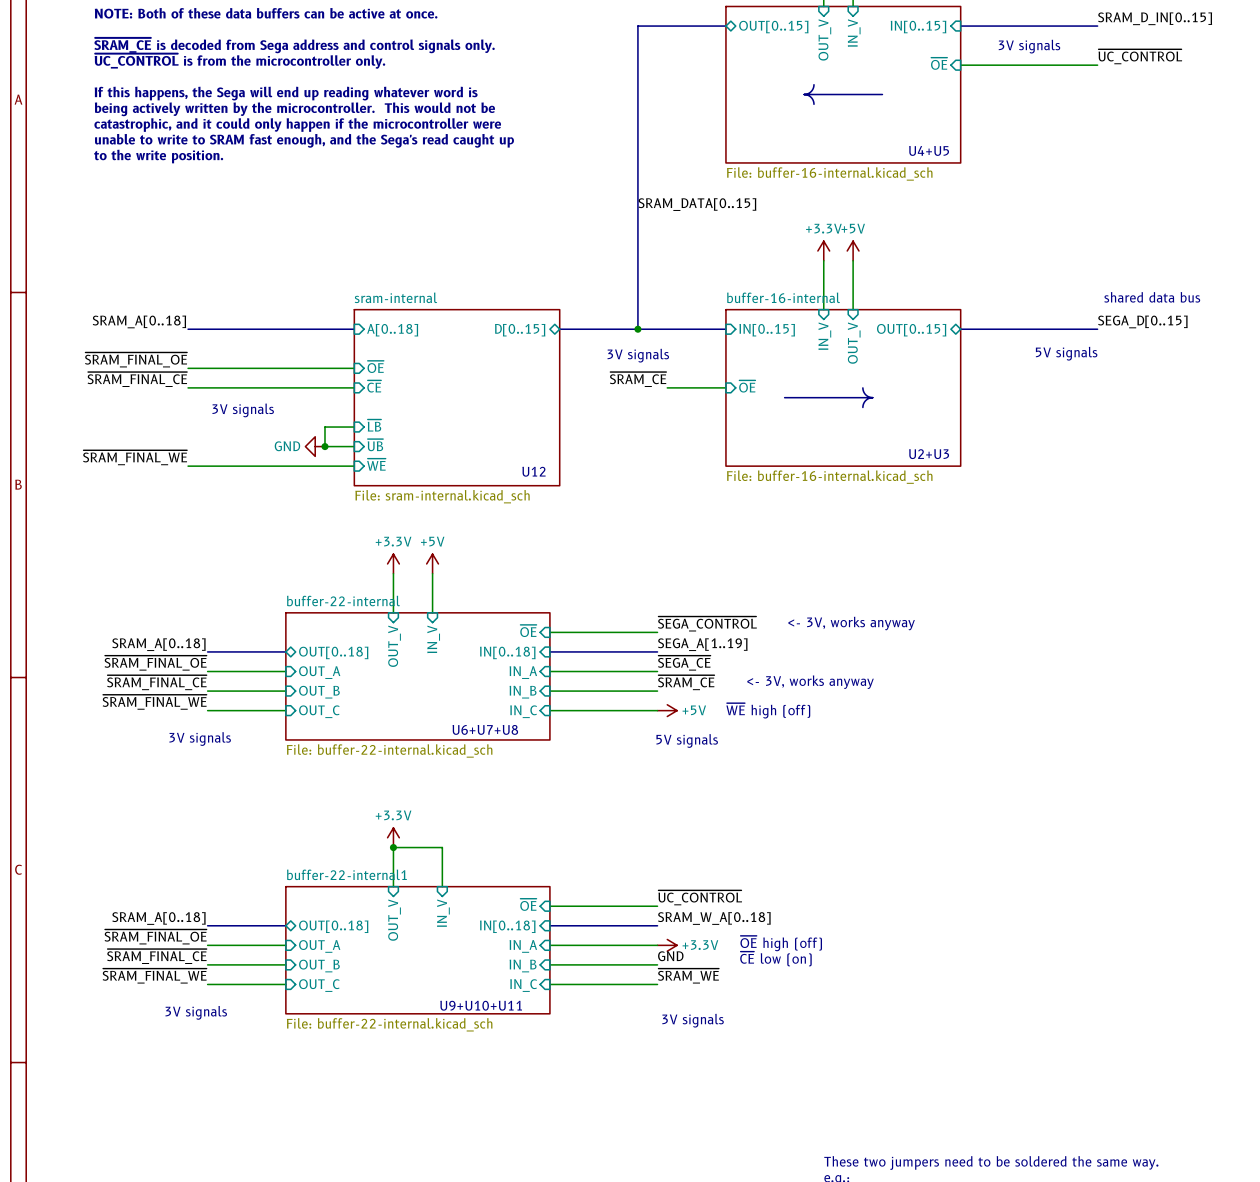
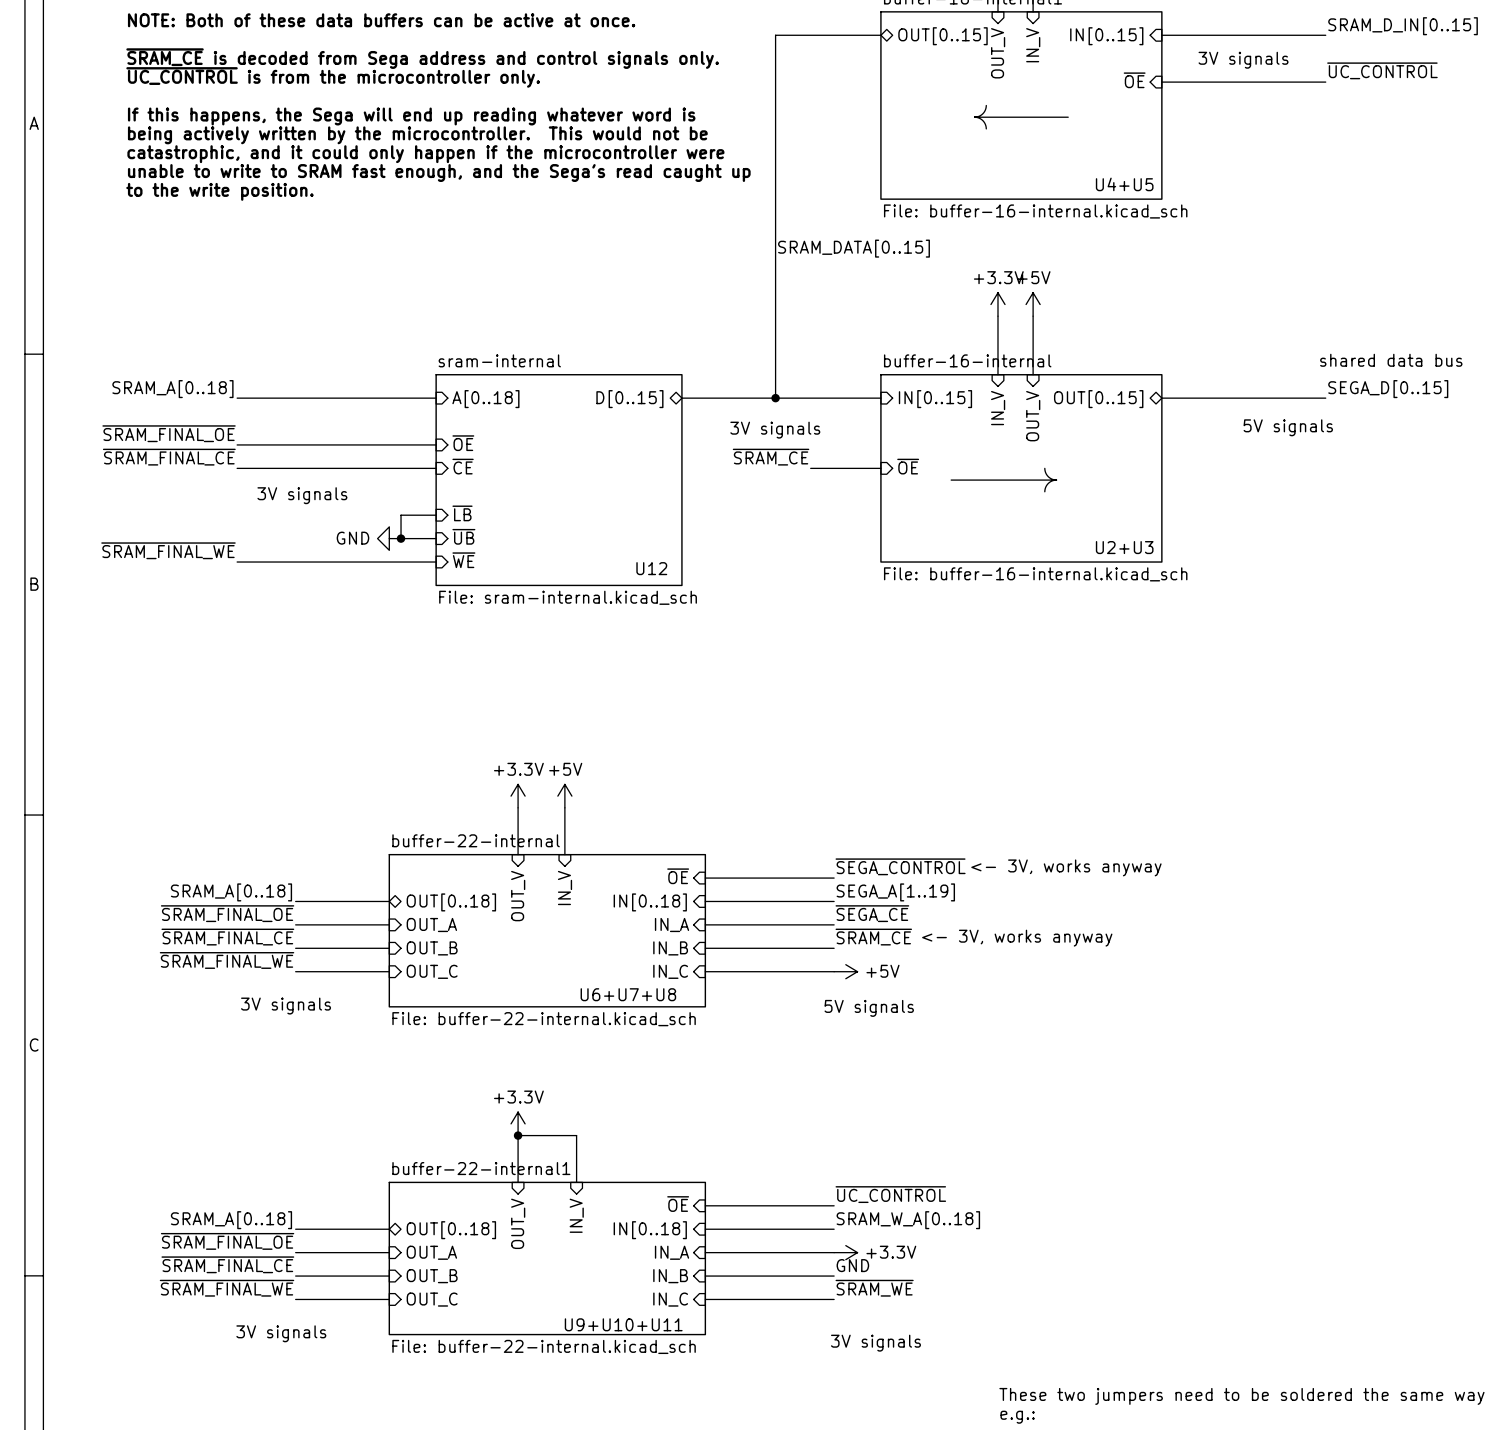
power symbol: +3.3V (393, 563) -> none
power symbol position: +5V (432, 563) -> +5V (564, 796)
wire: (393, 573) (393, 612) -> (518, 807) (518, 854)
wire: (432, 573) (432, 612) -> (564, 807) (564, 854)
text: <- 3V, works anyway (851, 623) -> none
label position: ~{SEGA_CONTROL} (707, 624) -> ~{SEGA_CONTROL} (900, 866)
sheet pin: ~{OE} (528, 630) -> none
wire: (549, 632) (657, 632) -> (705, 878) (834, 878)
sheet pin: IN_V (433, 639) -> none
label: SRAM_A[0..18] (159, 644) -> none
label position: SEGA_A[1..19] (702, 644) -> SEGA_A[1..19] (895, 892)
sheet pin: OUT_V (394, 646) -> none
bus: (207, 651) (285, 651) -> (295, 901) (389, 901)
bus: (549, 651) (657, 651) -> (705, 901) (834, 901)
sheet pin: OUT[0..18] (333, 652) -> none
sheet pin: IN[0..18] (507, 652) -> none
power symbol: none -> +3.3V (518, 796)
label: ~{SRAM_FINAL_OE} (155, 663) -> none
label position: ~{SEGA_CE} (684, 663) -> ~{SEGA_CE} (872, 913)
wire: (207, 671) (285, 671) -> (295, 924) (389, 924)
wire: (549, 671) (657, 671) -> (705, 924) (834, 924)
sheet pin: OUT_A (319, 672) -> none
sheet pin: IN_A (523, 672) -> none
sheet buffer-22-internal position: (417, 676) -> (547, 930)
label: ~{SRAM_FINAL_CE} (156, 682) -> none
label position: ~{SRAM_CE} (686, 682) -> ~{SRAM_CE} (873, 937)
text: <- 3V, works anyway (810, 682) -> none
wire: (207, 691) (285, 691) -> (295, 948) (389, 948)
wire: (549, 691) (657, 691) -> (705, 948) (834, 948)
sheet pin: OUT_B (319, 692) -> none
sheet pin: IN_B (523, 692) -> none
label: ~{SRAM_FINAL_WE} (154, 702) -> none
wire: (207, 710) (285, 710) -> (295, 971) (389, 971)
wire: (549, 710) (657, 710) -> (705, 971) (834, 971)
power symbol position: +5V (667, 710) -> +5V (845, 971)
text: ~{WE} high (off) (768, 710) -> none
sheet pin: OUT_C (319, 711) -> none
sheet pin: IN_C (523, 711) -> none
text: none -> <- 3V, works anyway (1066, 867)
sheet pin: none -> ~{OE} (678, 876)
text position: U6+U7+U8 (485, 729) -> U6+U7+U8 (628, 994)
sheet pin: none -> IN_V (565, 888)
text: 3V signals (200, 739) -> none
text position: 5V signals (687, 740) -> 5V signals (869, 1008)
label: none -> SRAM_A[0..18] (231, 892)
sheet pin: none -> OUT_V (518, 896)
sheet pin: none -> OUT[0..18] (451, 902)
sheet pin: none -> IN[0..18] (650, 902)
label: none -> ~{SRAM_FINAL_OE} (227, 913)
sheet pin: none -> OUT_A (431, 925)
sheet pin: none -> IN_A (672, 925)
text: none -> <- 3V, works anyway (1017, 938)
label: none -> ~{SRAM_FINAL_CE} (227, 937)
sheet pin: none -> OUT_B (432, 948)
sheet pin: none -> IN_B (670, 948)
label: none -> ~{SRAM_FINAL_WE} (227, 960)
sheet pin: none -> OUT_C (432, 971)
sheet pin: none -> IN_C (670, 971)
text: none -> 3V signals (286, 1006)
power symbol: +3.3V (393, 837) -> none
junction: (393, 847) -> none
wire: (393, 886) (393, 847) (442, 847) (442, 886) -> (518, 1182) (518, 1135) (576, 1135) (576, 1182)
label position: ~{UC_CONTROL} (700, 897) -> ~{UC_CONTROL} (890, 1194)
sheet pin: ~{OE} (528, 904) -> none
wire: (549, 906) (657, 906) -> (705, 1205) (834, 1205)
sheet pin: IN_V (443, 913) -> none
label: SRAM_A[0..18] (159, 918) -> none
label position: SRAM_W_A[0..18] (714, 918) -> SRAM_W_A[0..18] (908, 1220)
sheet pin: OUT_V (394, 920) -> none
bus: (207, 925) (285, 925) -> (295, 1229) (389, 1229)
bus: (549, 925) (657, 925) -> (705, 1229) (834, 1229)
sheet pin: OUT[0..18] (333, 926) -> none
sheet pin: IN[0..18] (507, 926) -> none
power symbol: none -> +3.3V (518, 1123)
label: ~{SRAM_FINAL_OE} (155, 936) -> none
text: ~{OE} high (off) (781, 943) -> none
wire: (207, 945) (285, 945) -> (295, 1252) (389, 1252)
junction: none -> (518, 1135)
wire: (549, 945) (657, 945) -> (705, 1252) (834, 1252)
power symbol position: +3.3V (667, 945) -> +3.3V (845, 1252)
sheet pin: OUT_A (319, 946) -> none
sheet pin: IN_A (523, 946) -> none
sheet buffer-22-internal1 position: (417, 950) -> (547, 1258)
label: ~{SRAM_FINAL_CE} (156, 956) -> none
label position: GND (670, 956) -> GND (852, 1265)
text: ~{CE} low (on) (775, 958) -> none
wire: (207, 964) (285, 964) -> (295, 1276) (389, 1276)
wire: (549, 964) (657, 964) -> (705, 1276) (834, 1276)
sheet pin: OUT_B (319, 966) -> none
sheet pin: IN_B (523, 966) -> none
label: ~{SRAM_FINAL_WE} (154, 976) -> none
label position: ~{SRAM_WE} (688, 976) -> ~{SRAM_WE} (874, 1288)
wire: (207, 984) (285, 984) -> (295, 1299) (389, 1299)
wire: (549, 984) (657, 984) -> (705, 1299) (834, 1299)
sheet pin: OUT_C (319, 985) -> none
sheet pin: IN_C (523, 985) -> none
sheet pin: none -> ~{OE} (678, 1204)
text position: U9+U10+U11 (481, 1005) -> U9+U10+U11 (623, 1324)
sheet pin: none -> IN_V (576, 1215)
text: 3V signals (196, 1012) -> none
label: none -> SRAM_A[0..18] (231, 1220)
sheet pin: none -> OUT_V (518, 1223)
text: 3V signals (693, 1020) -> none
sheet pin: none -> OUT[0..18] (451, 1230)
sheet pin: none -> IN[0..18] (650, 1230)
label: none -> ~{SRAM_FINAL_OE} (227, 1241)
sheet pin: none -> OUT_A (431, 1252)
sheet pin: none -> IN_A (672, 1252)
label: none -> ~{SRAM_FINAL_CE} (227, 1264)
sheet pin: none -> OUT_B (432, 1276)
sheet pin: none -> IN_B (670, 1276)
label: none -> ~{SRAM_FINAL_WE} (227, 1288)
sheet pin: none -> OUT_C (432, 1299)
sheet pin: none -> IN_C (670, 1299)
text: none -> 3V signals (281, 1333)
text: none -> 3V signals (875, 1343)

